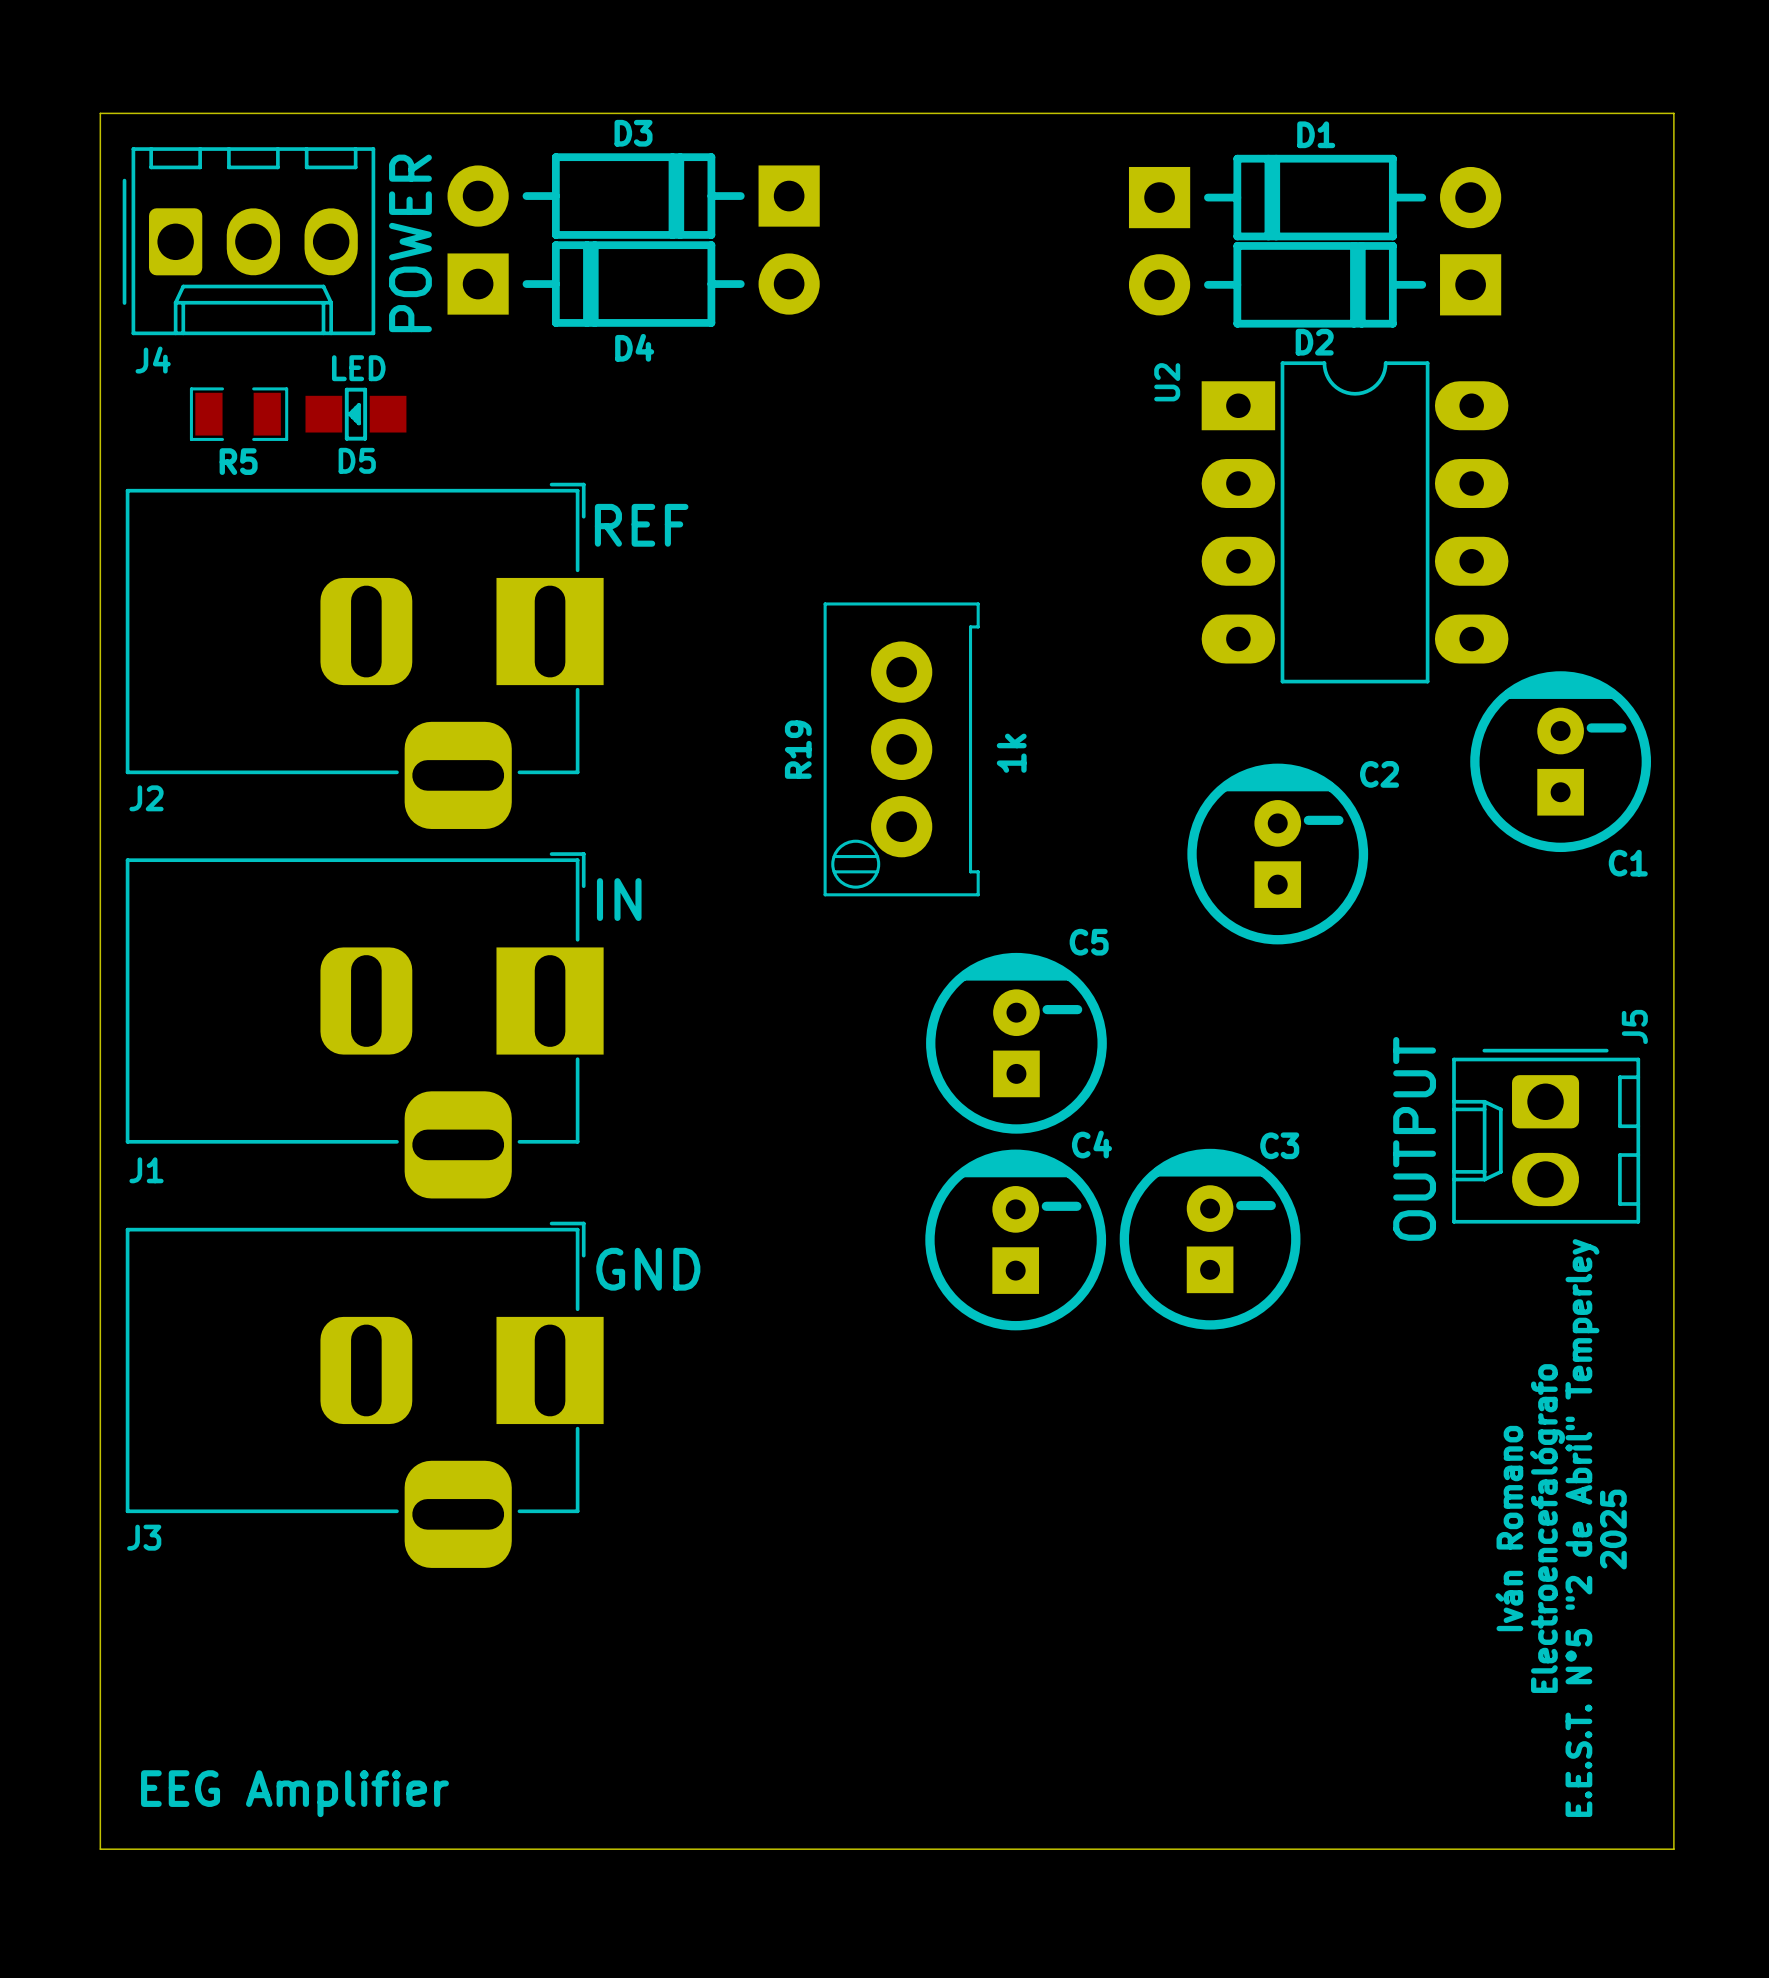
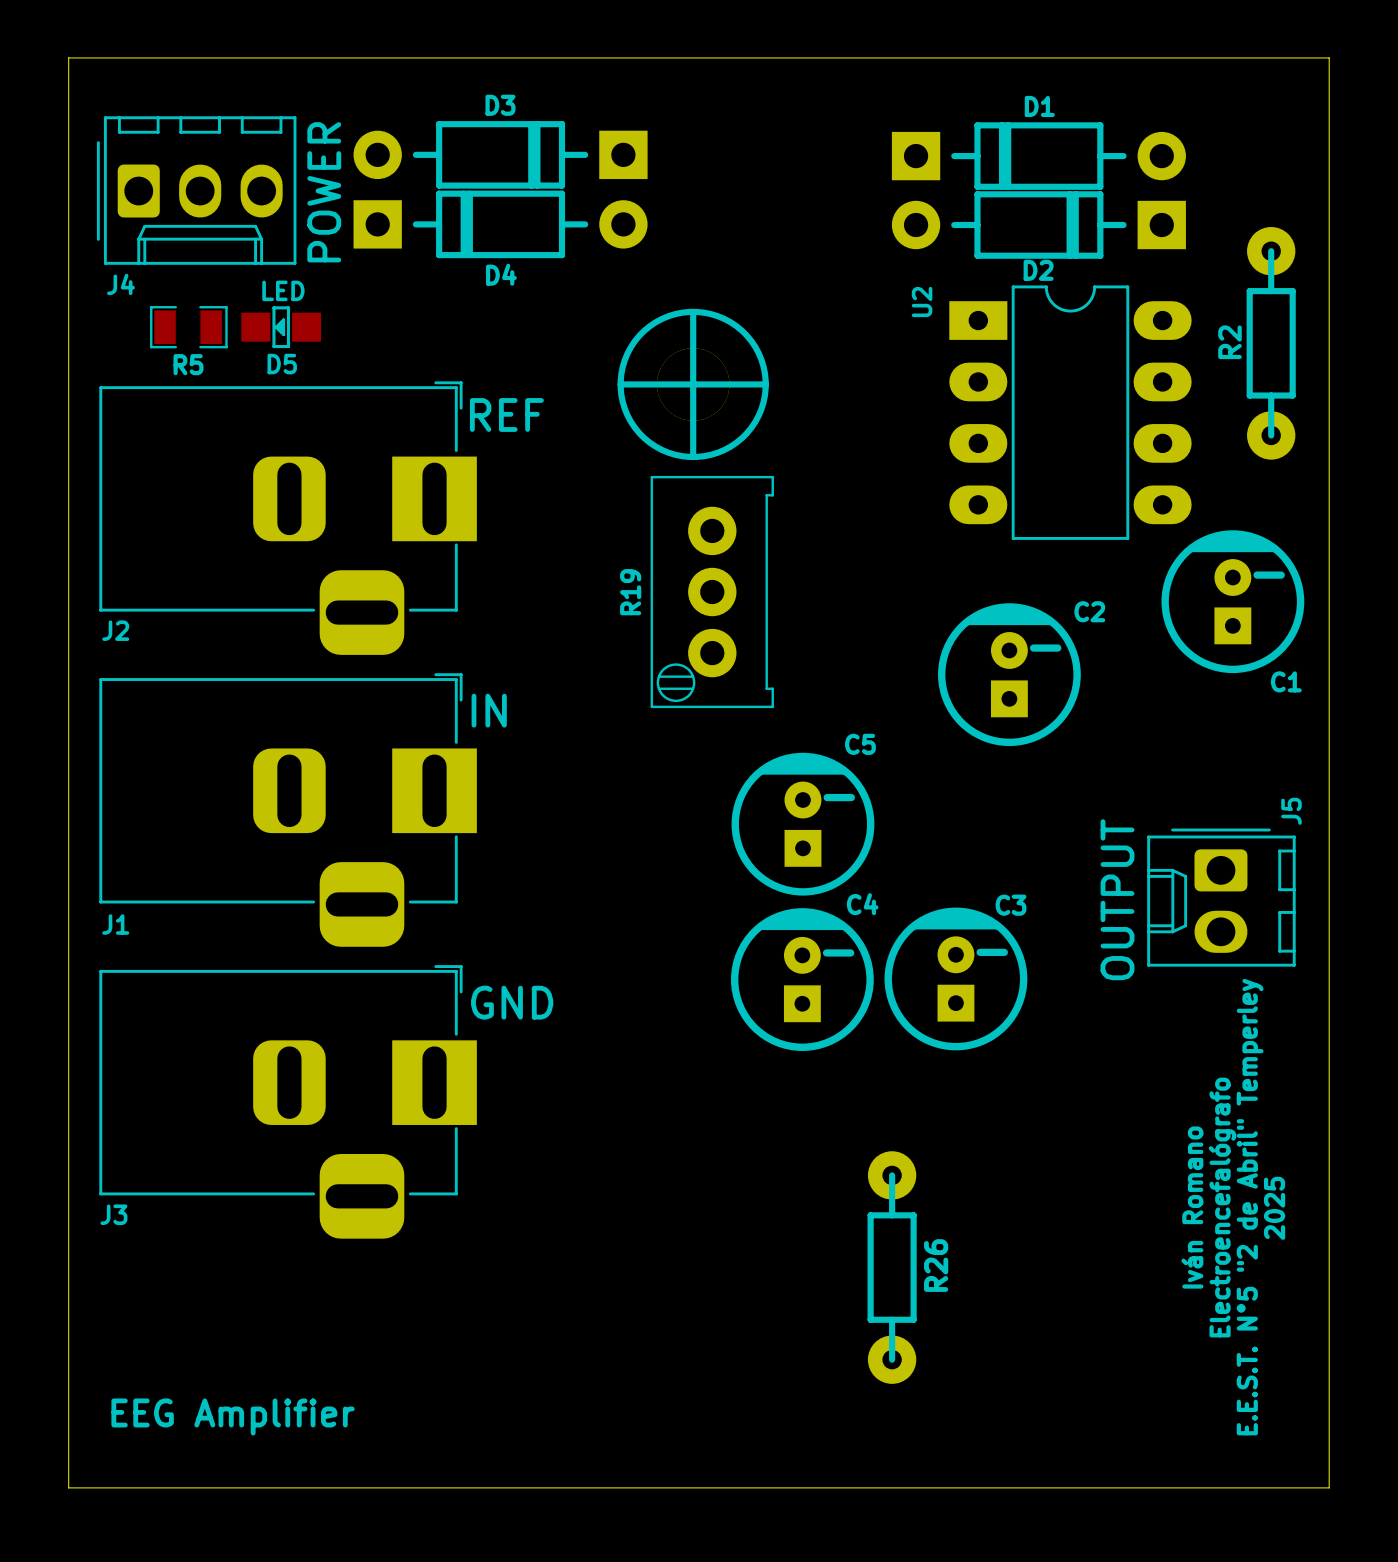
board edge: (100, 113) (1673, 113) (1673, 1849) (100, 1849) (100, 113) -> (68, 57) (68, 1487) (1329, 1487) (1329, 57) (68, 57)
R2: none -> (1271, 343)
part: none -> (693, 384)
R19 value: 1k (1011, 753) -> none
R26: none -> (892, 1267)

